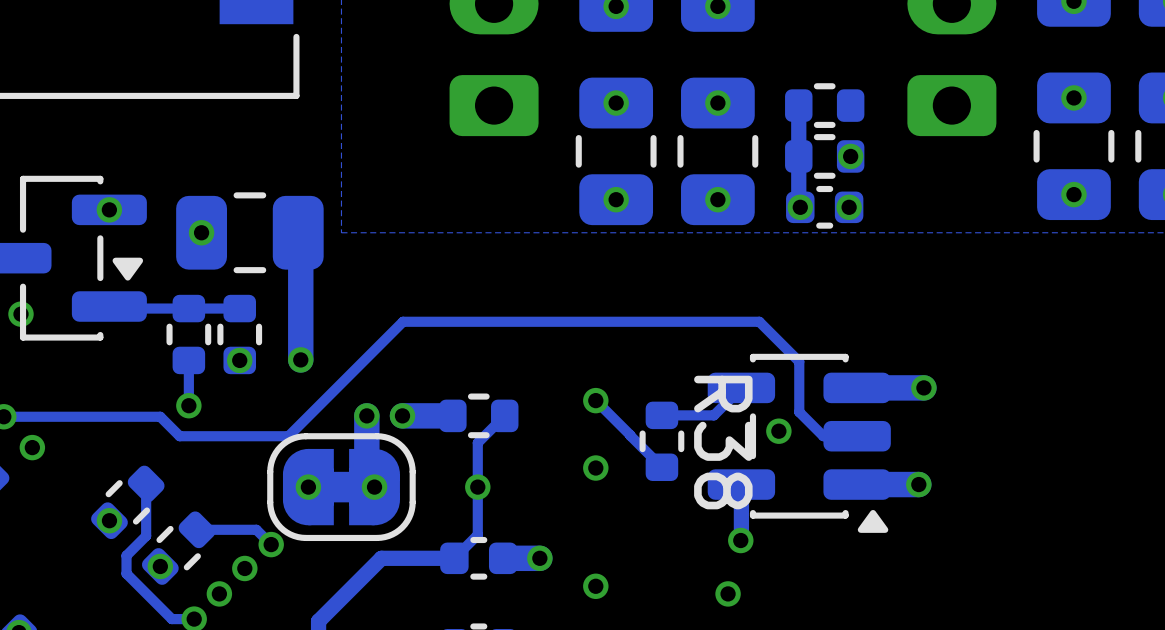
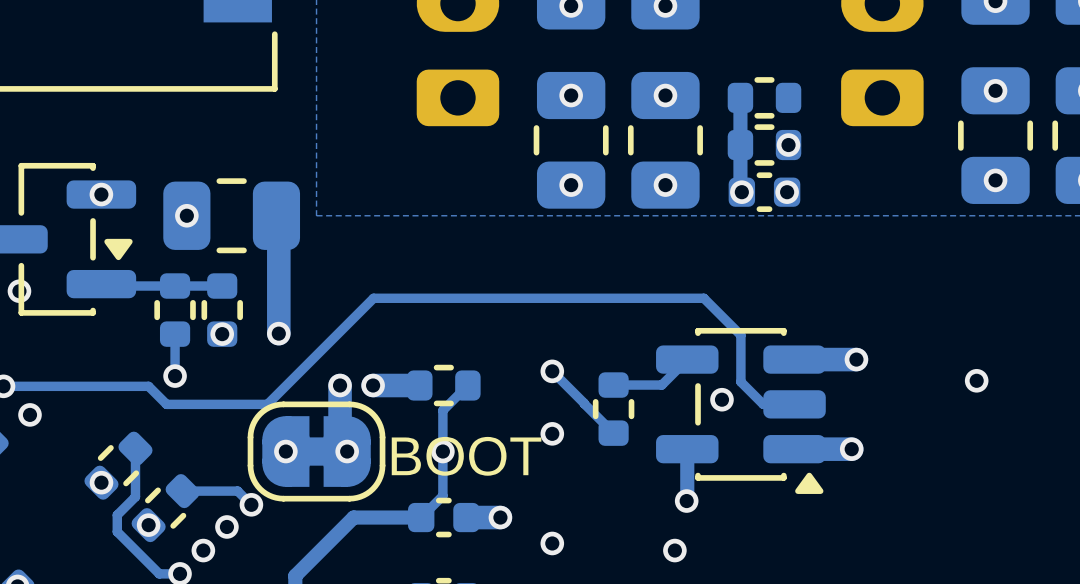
via: none -> (976, 380)
R38 name: R38 (723, 442) -> none
text: none -> BOOT (466, 456)

